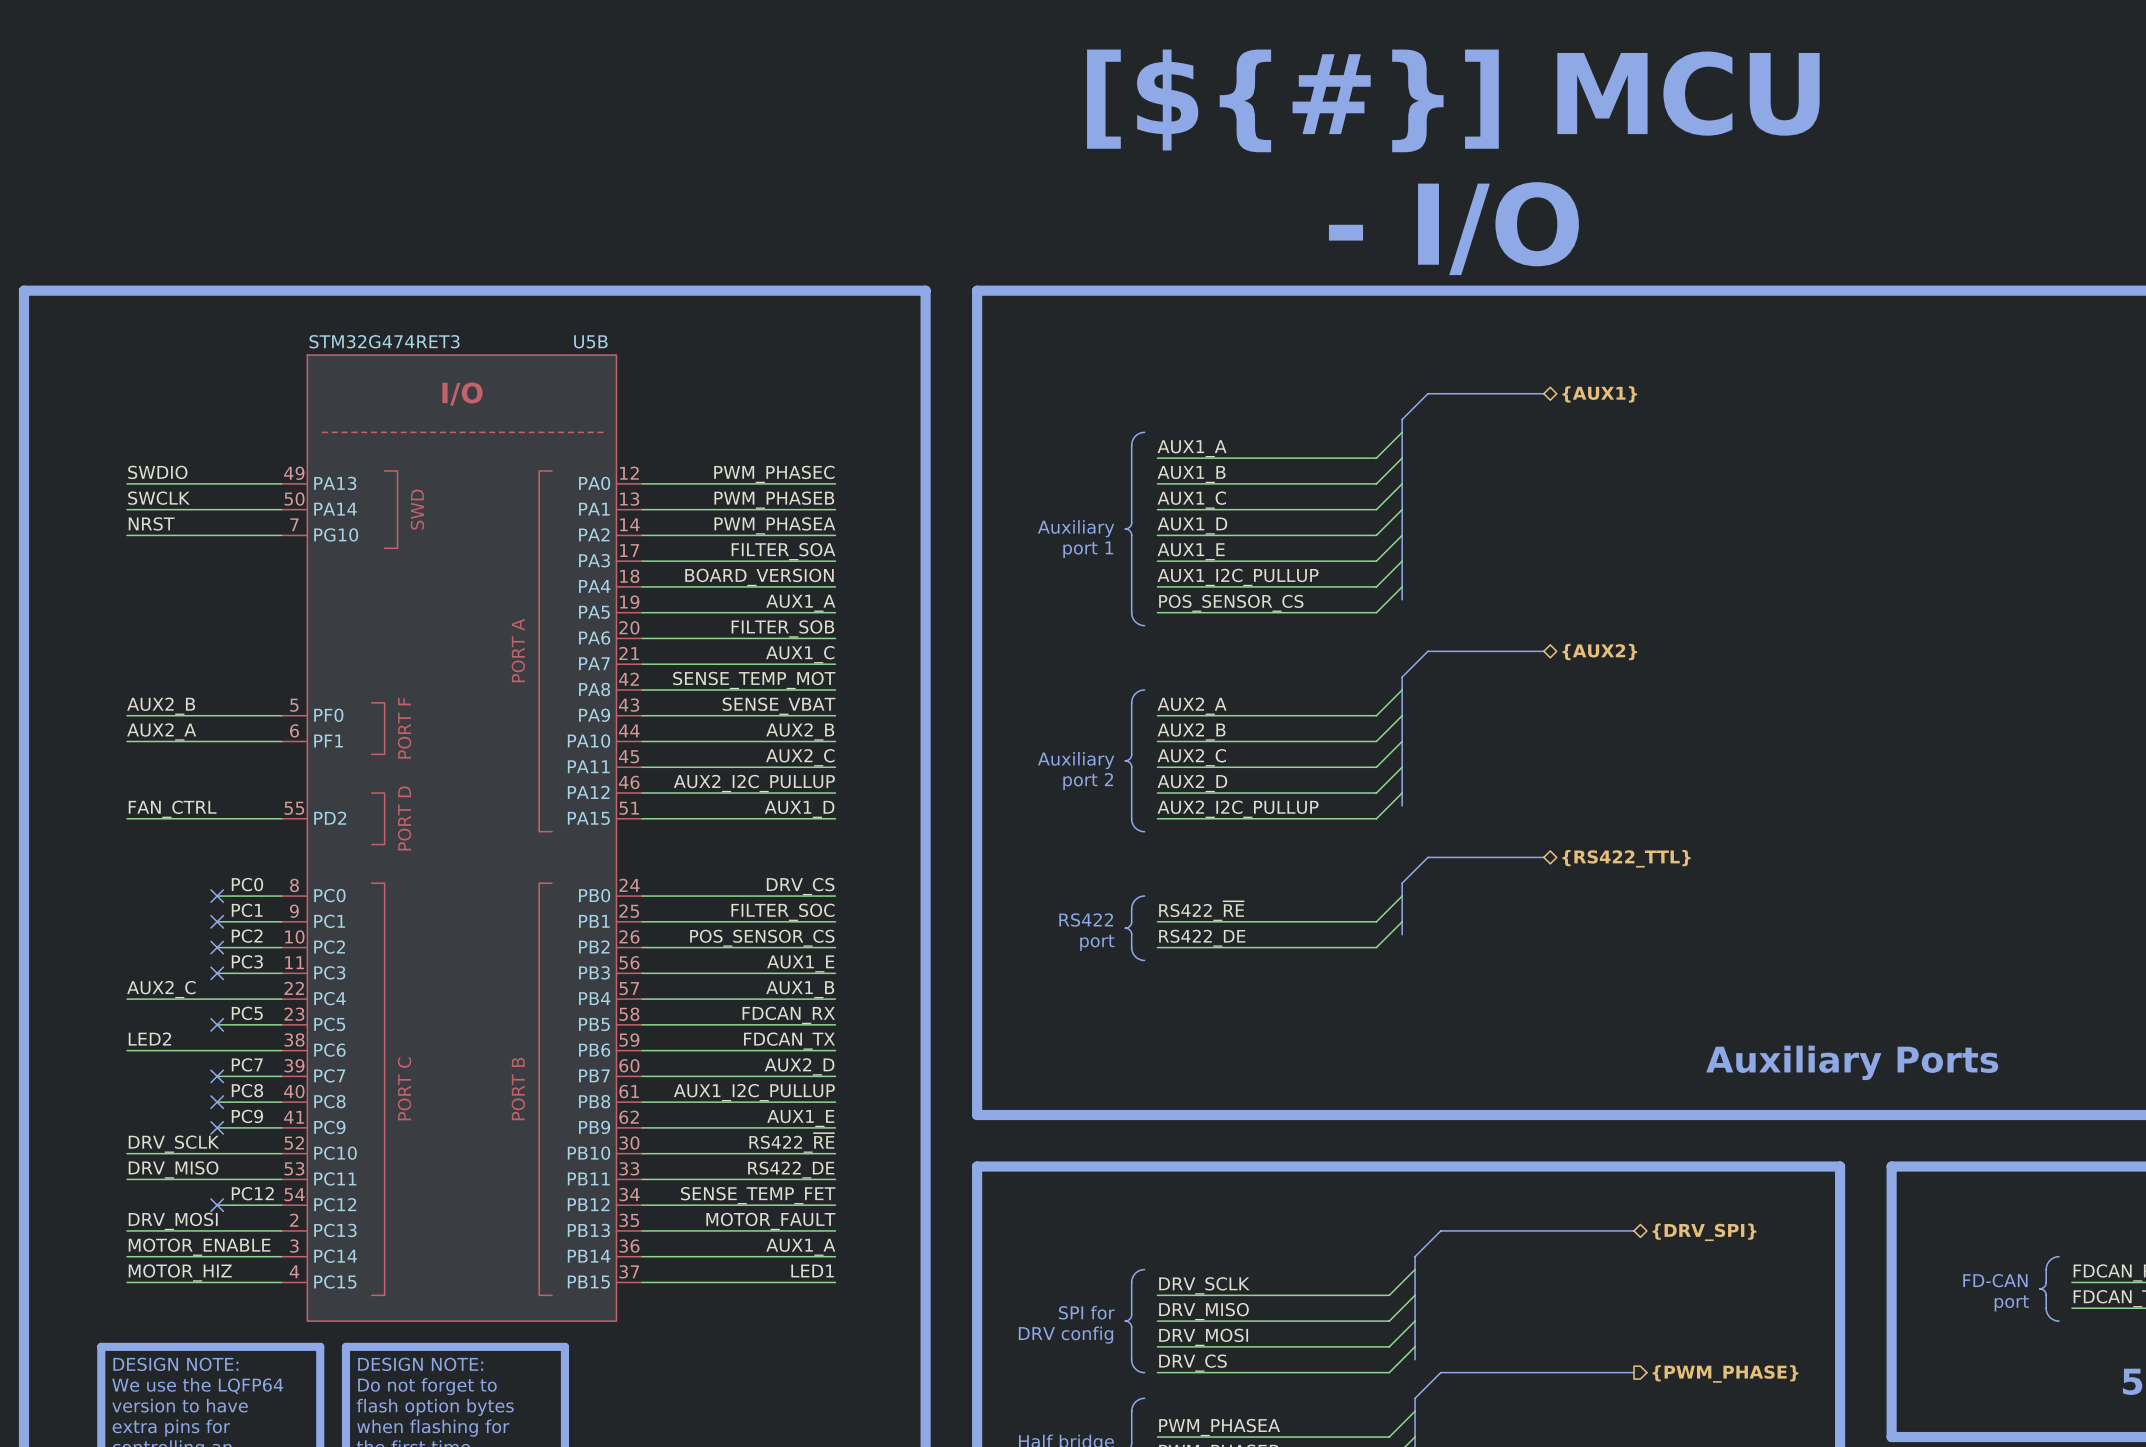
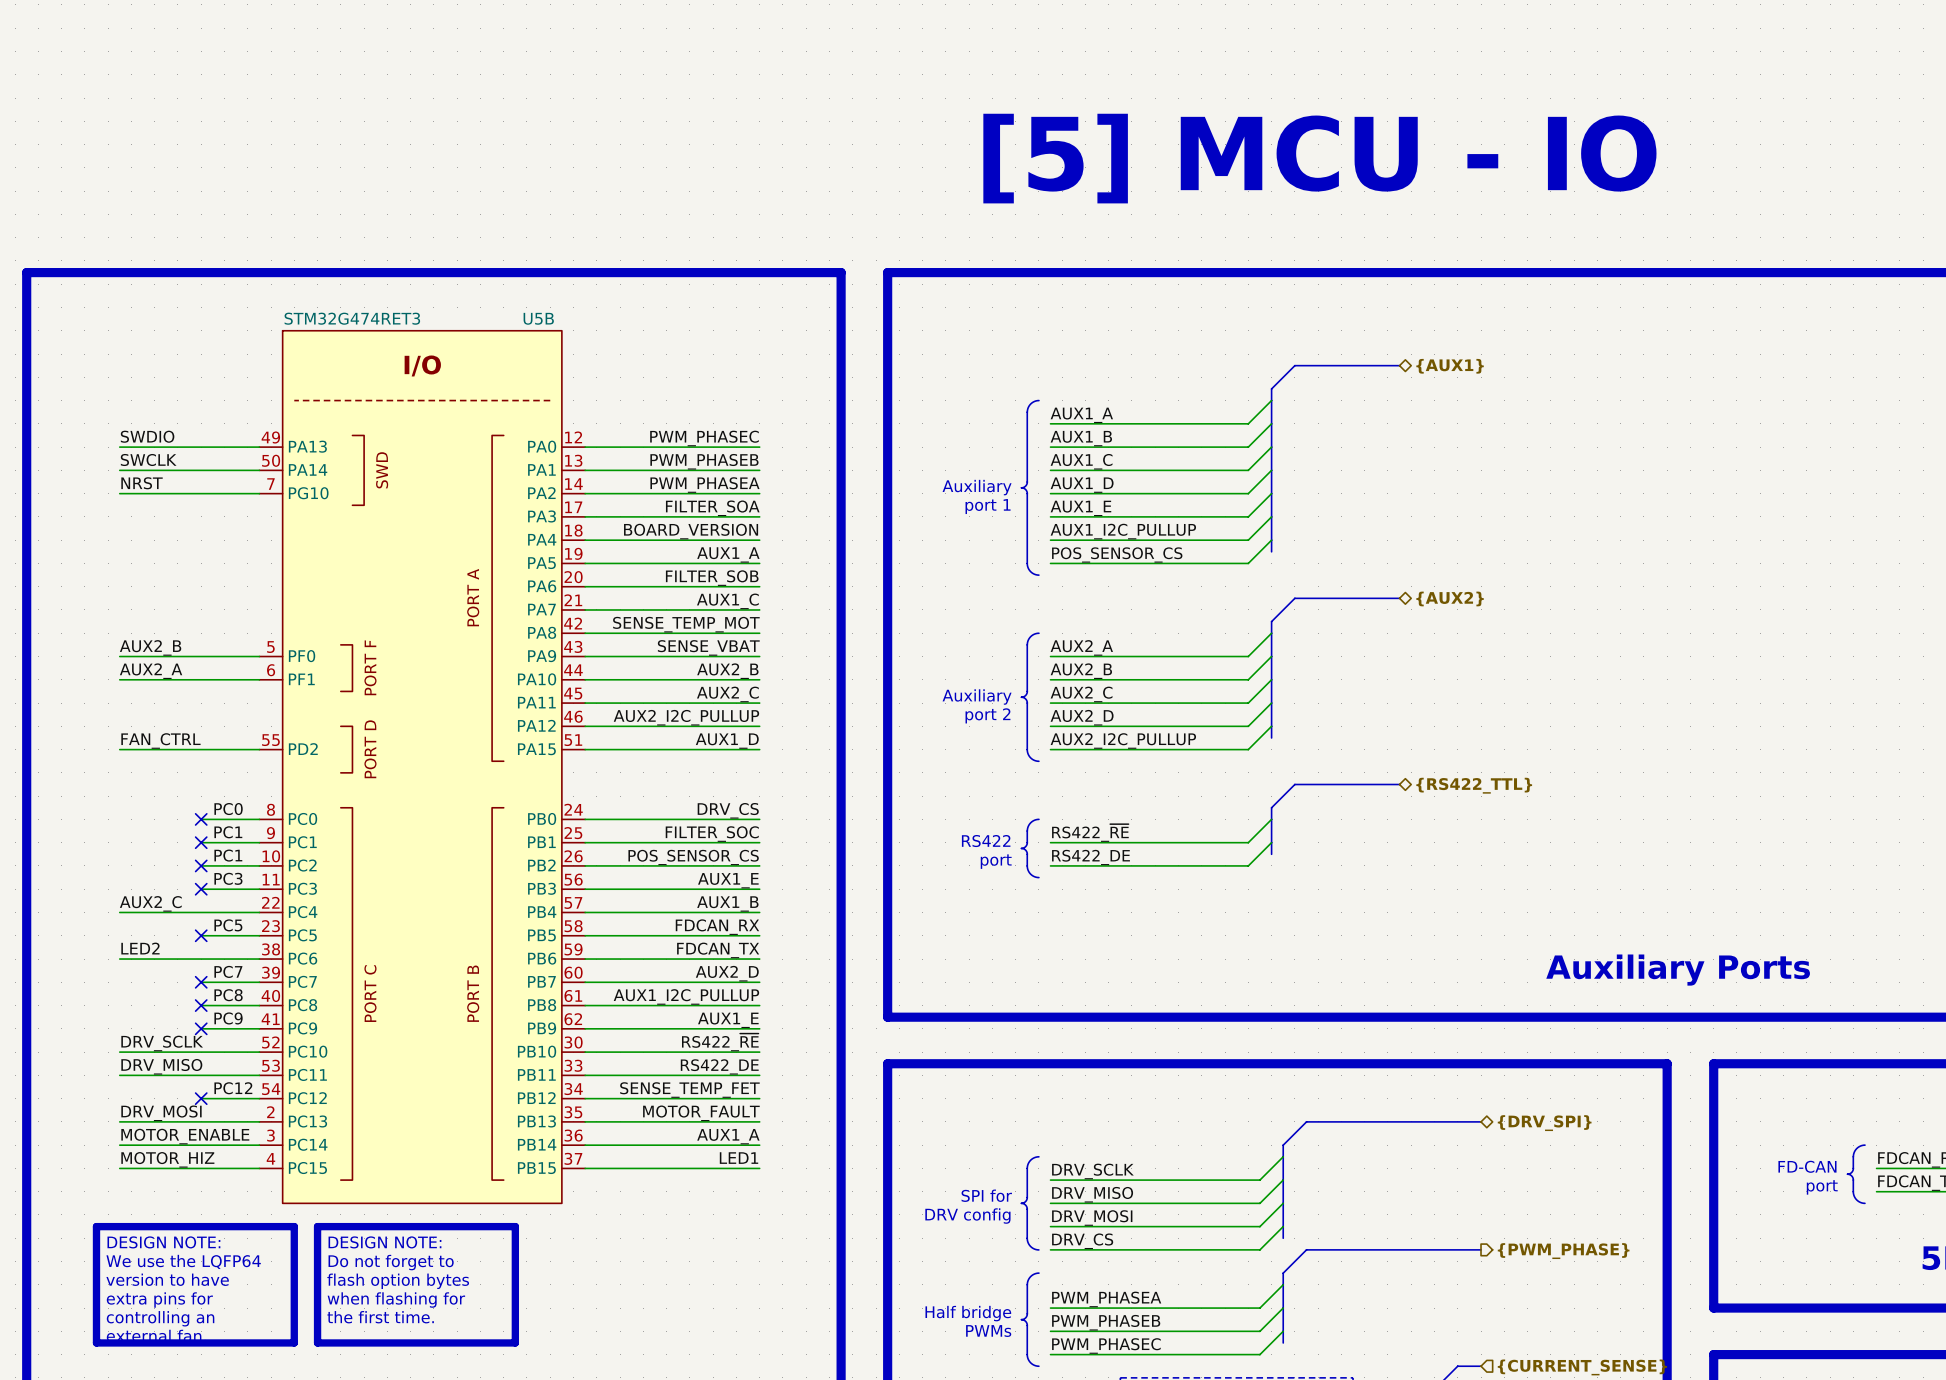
text: [${#}] MCU (1453, 100) -> none
text: none -> [5] MCU - IO (1319, 158)
text: - I/O (1453, 228) -> none
label: PC2 (247, 936) -> PC1 (228, 855)

